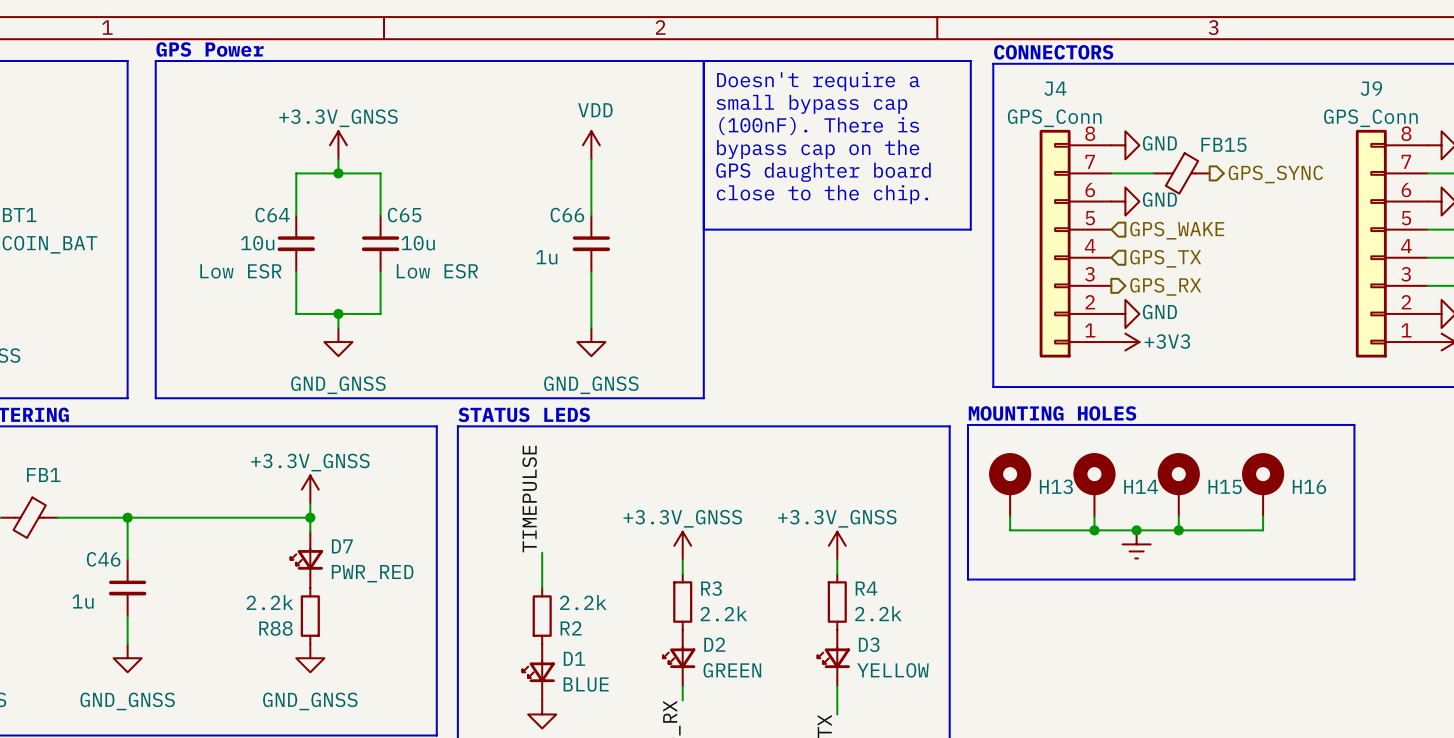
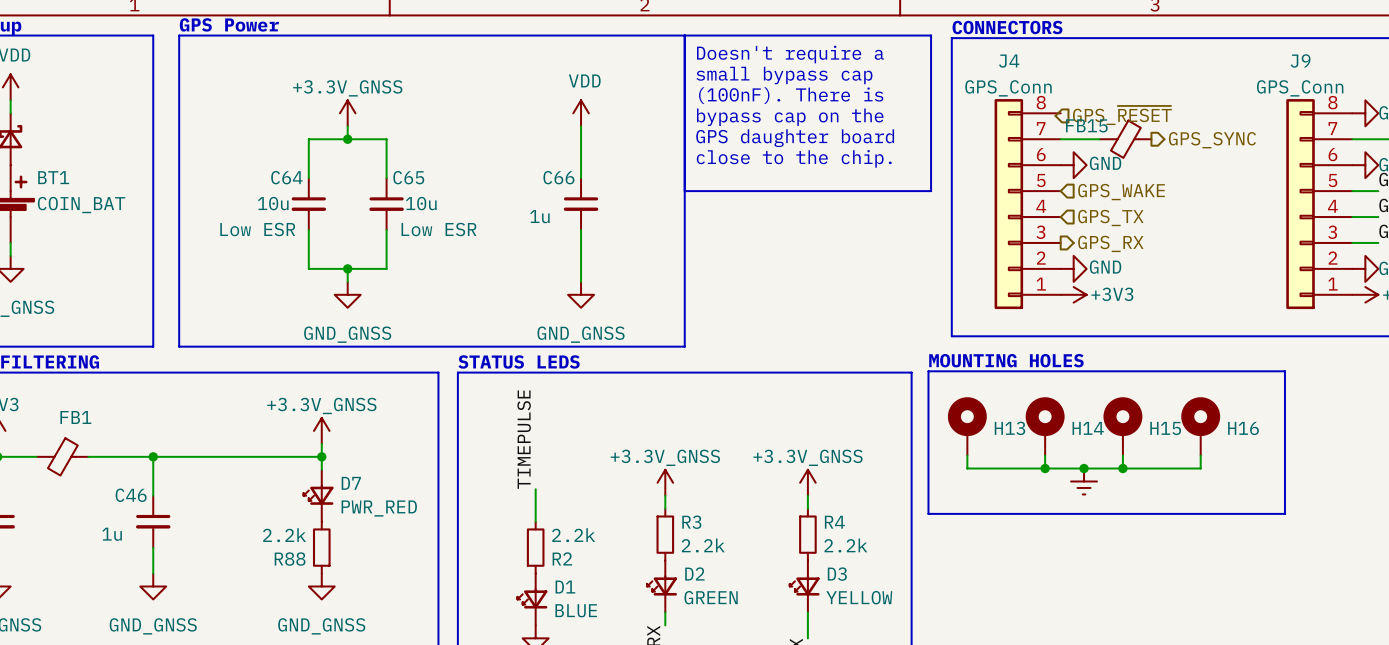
FB15 name position: FB15 (1223, 144) -> FB15 (1086, 125)
power symbol: GND (1125, 145) -> none
hierarchical label: none -> GPS_~{RESET} (1122, 115)

